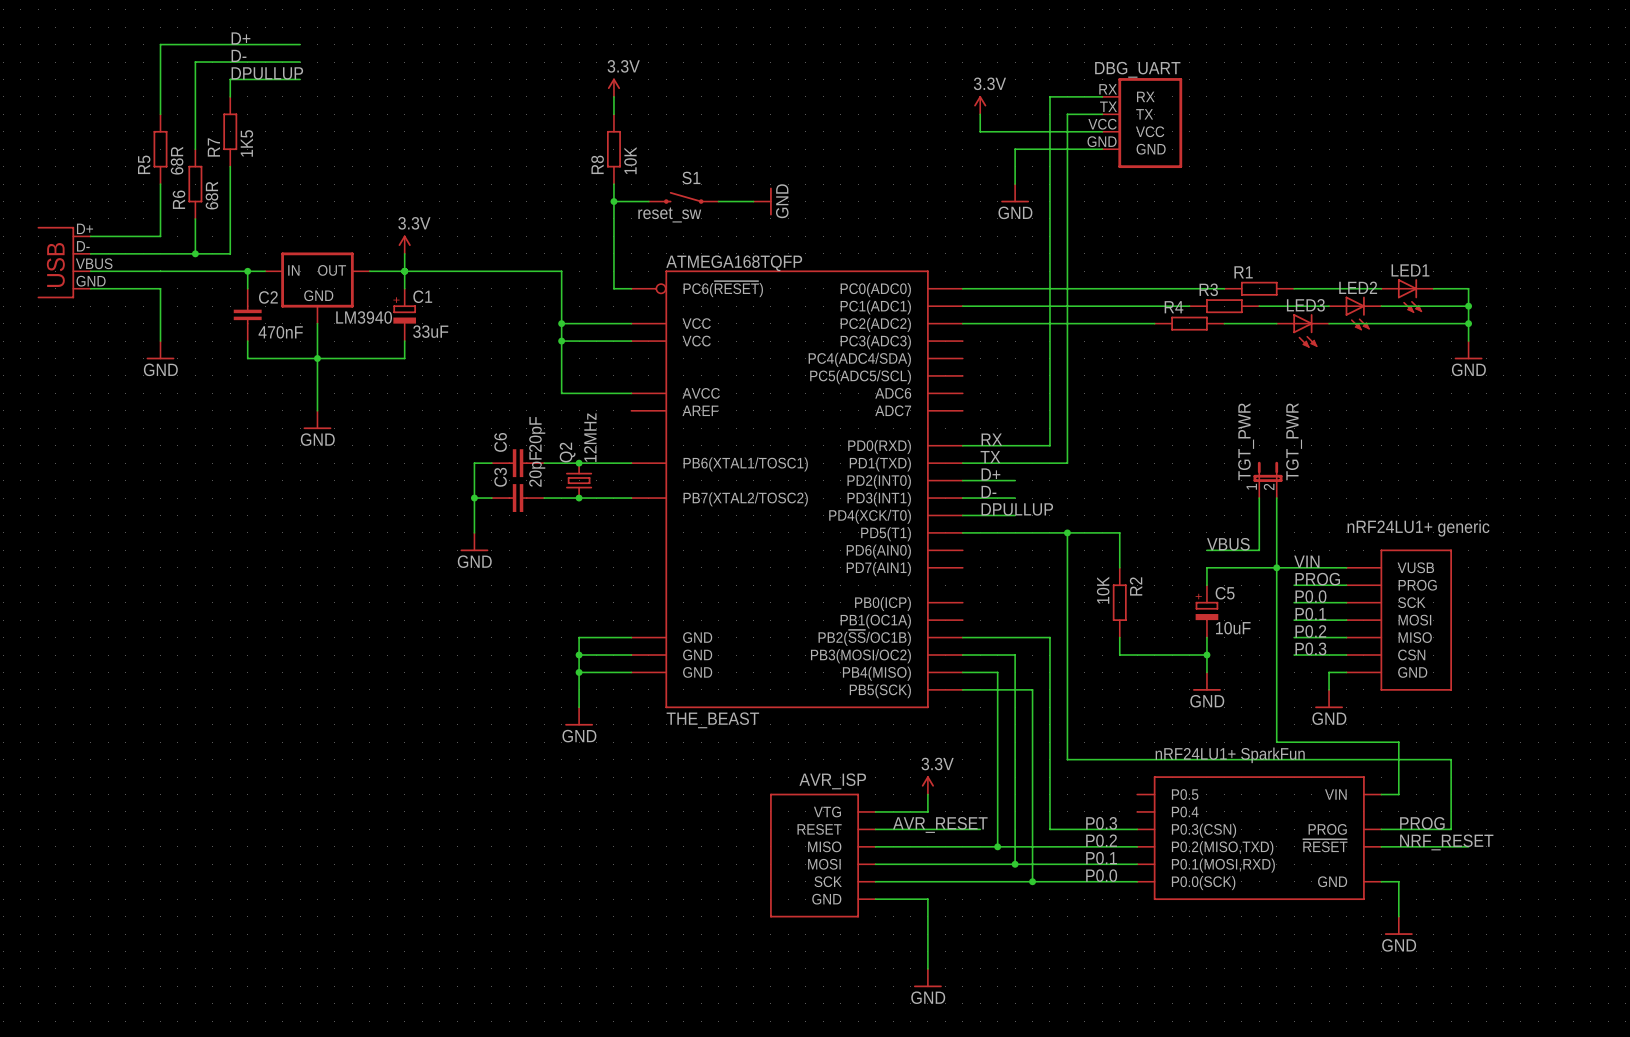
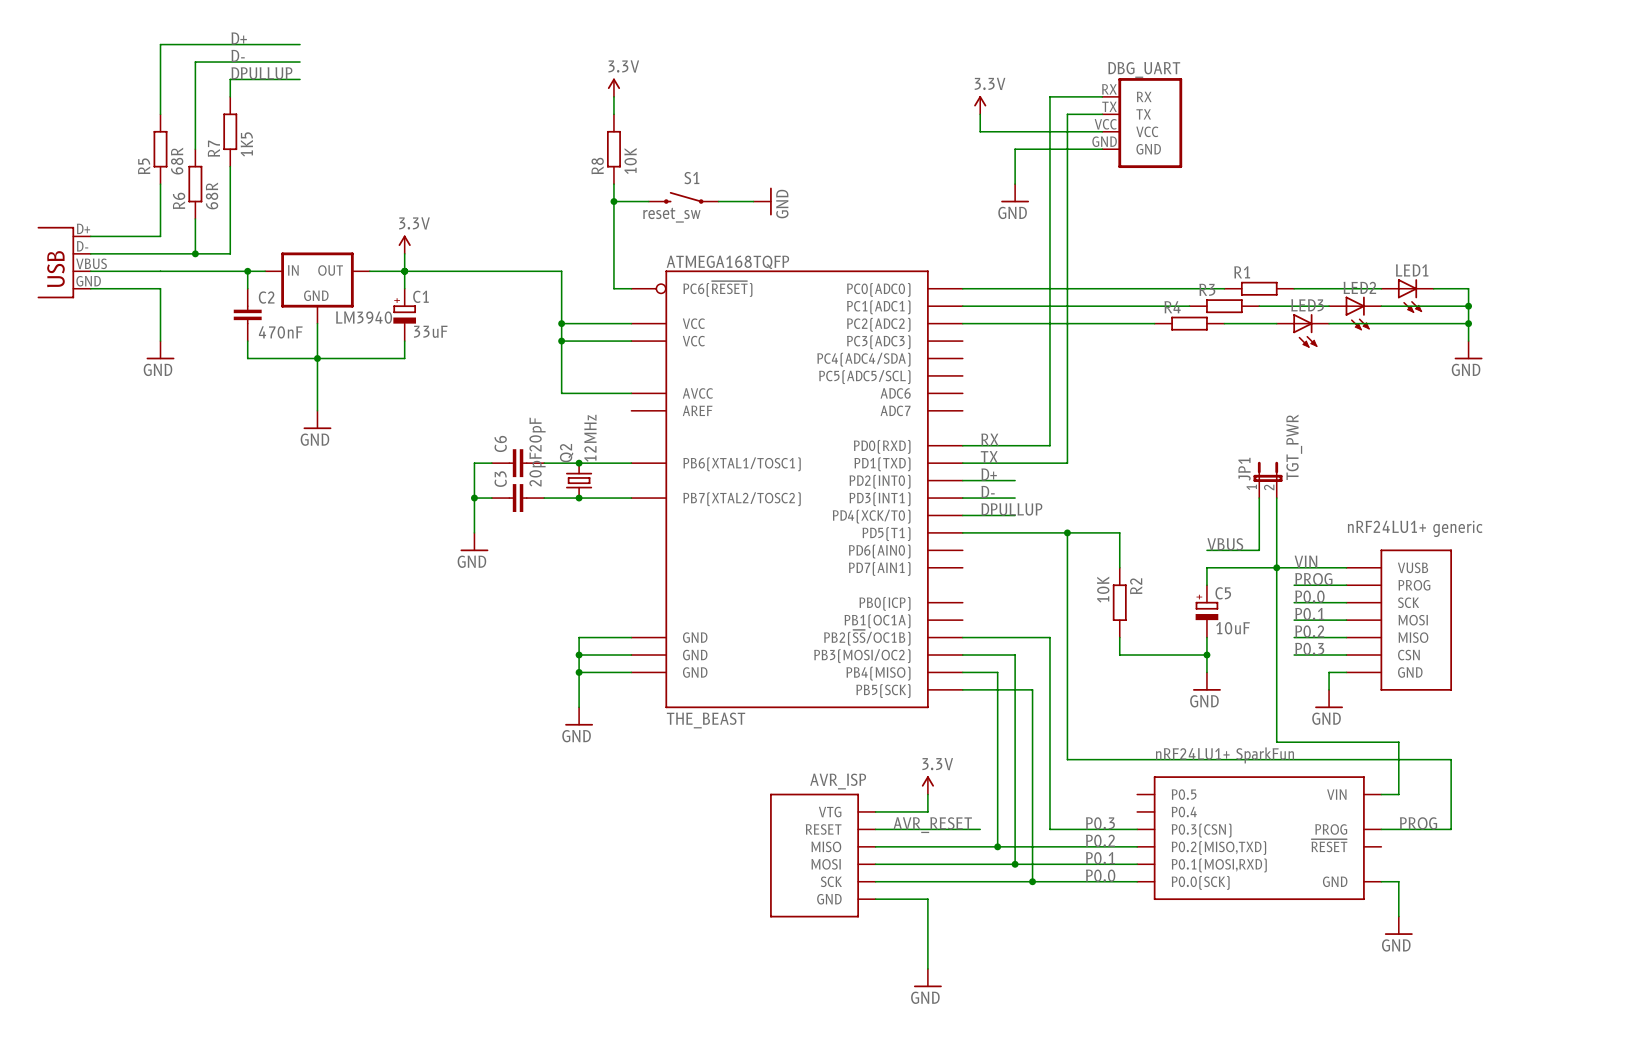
TGT_PWR name: TGT_PWR (1246, 441) -> JP1 (1244, 469)
label: NRF_RESET (1446, 842) -> none
wire: (1381, 846) (1468, 846) -> none

